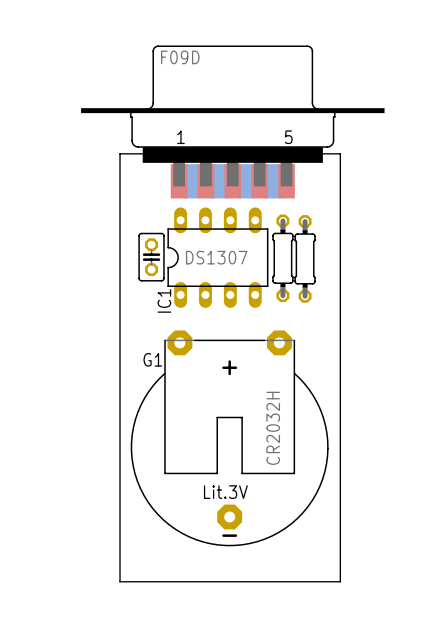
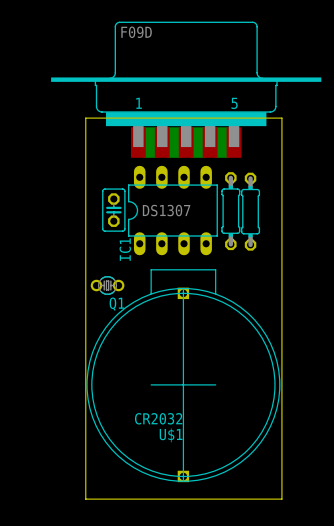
Q1: none -> (107, 285)
G1: CR2032H (229, 438) -> none
U$1: none -> CR2032 (183, 375)

